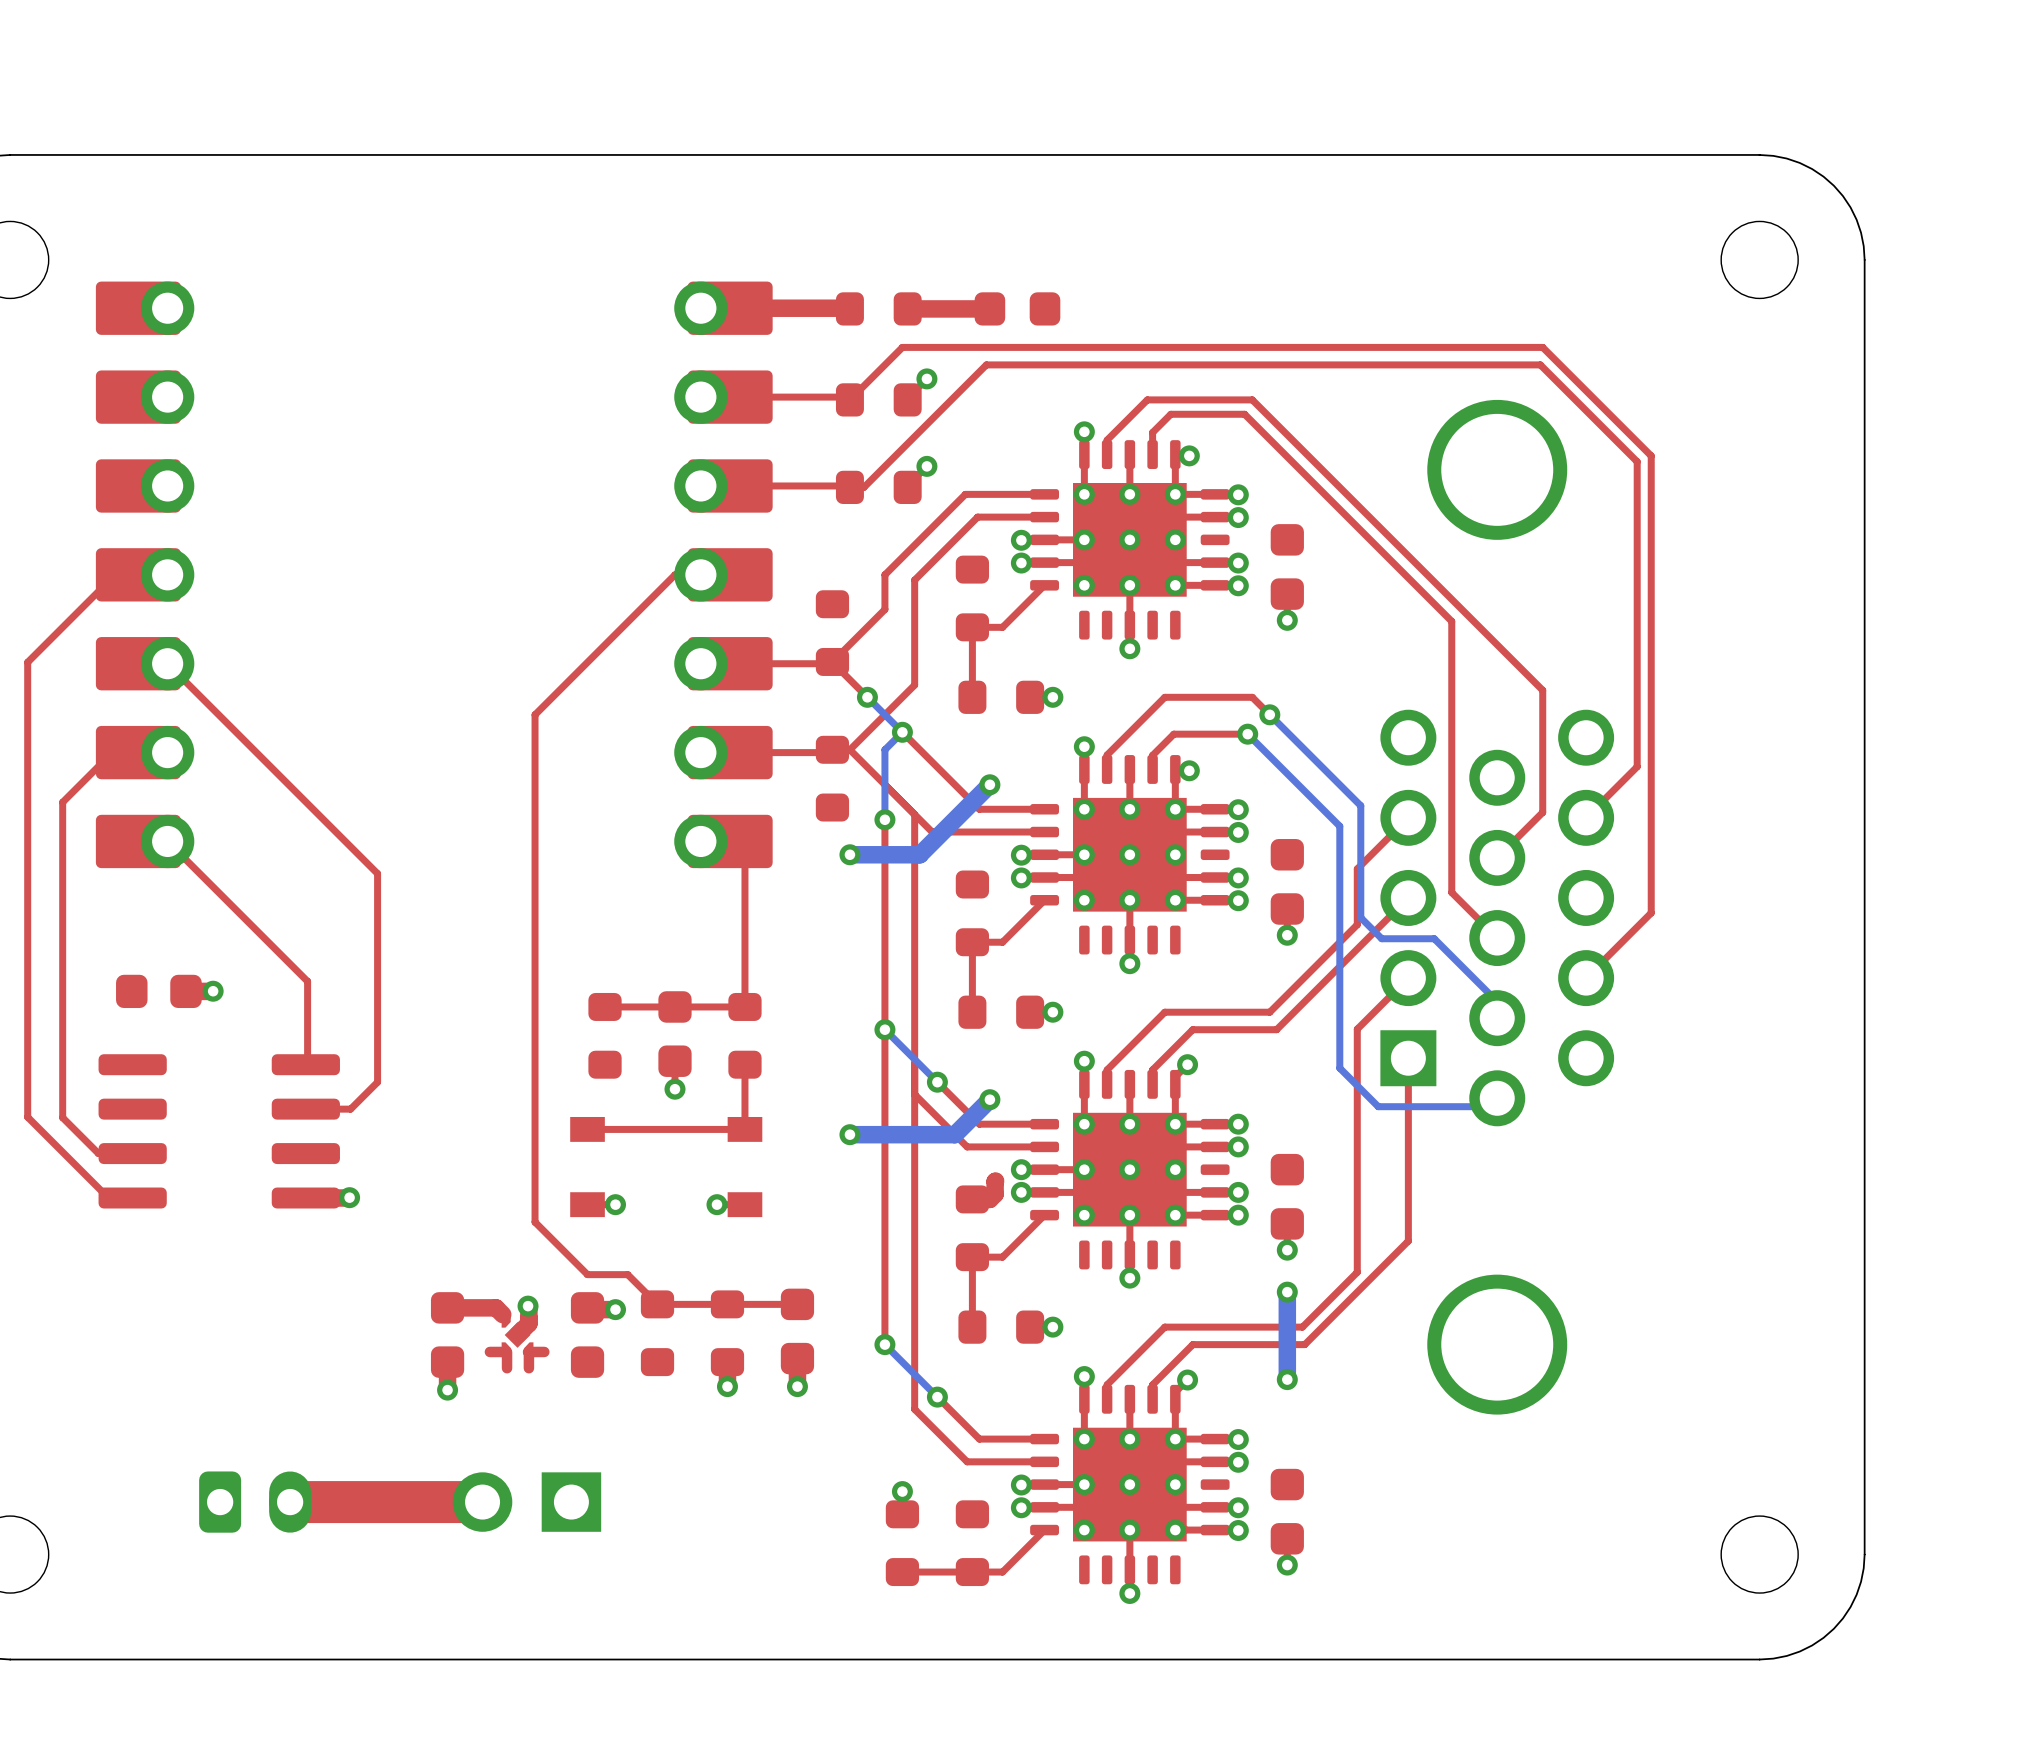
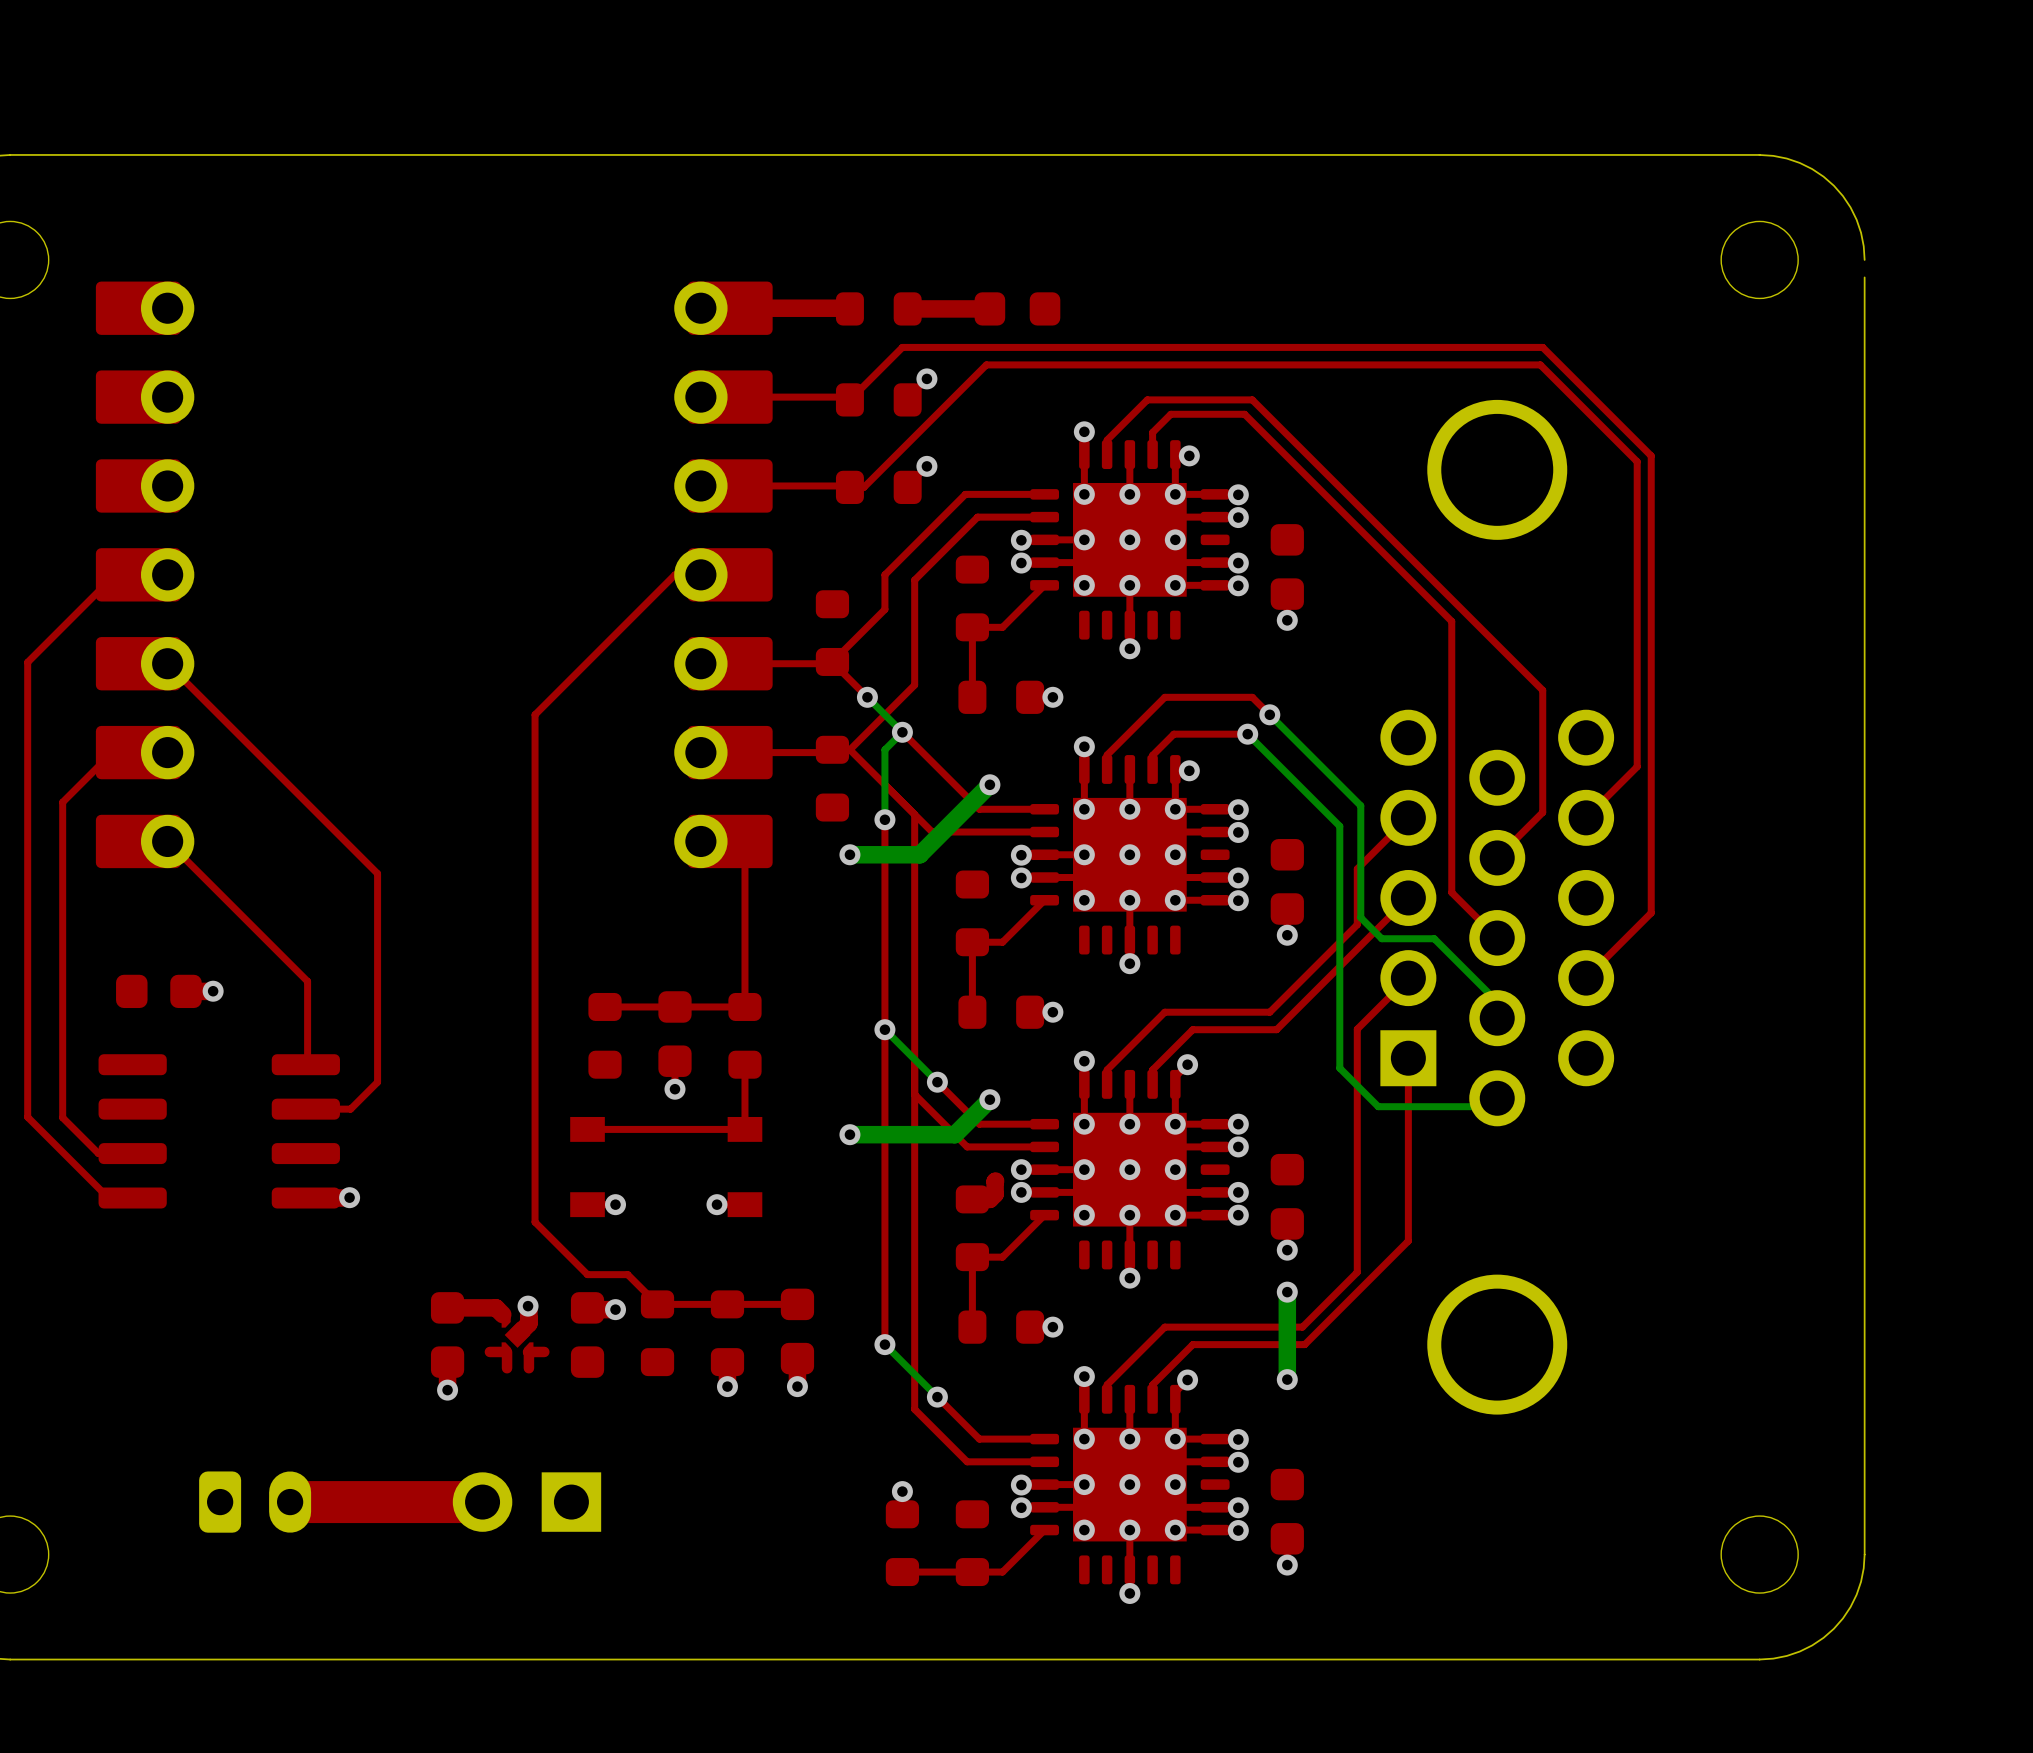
board edge: (1864, 259) (1864, 277) -> none

